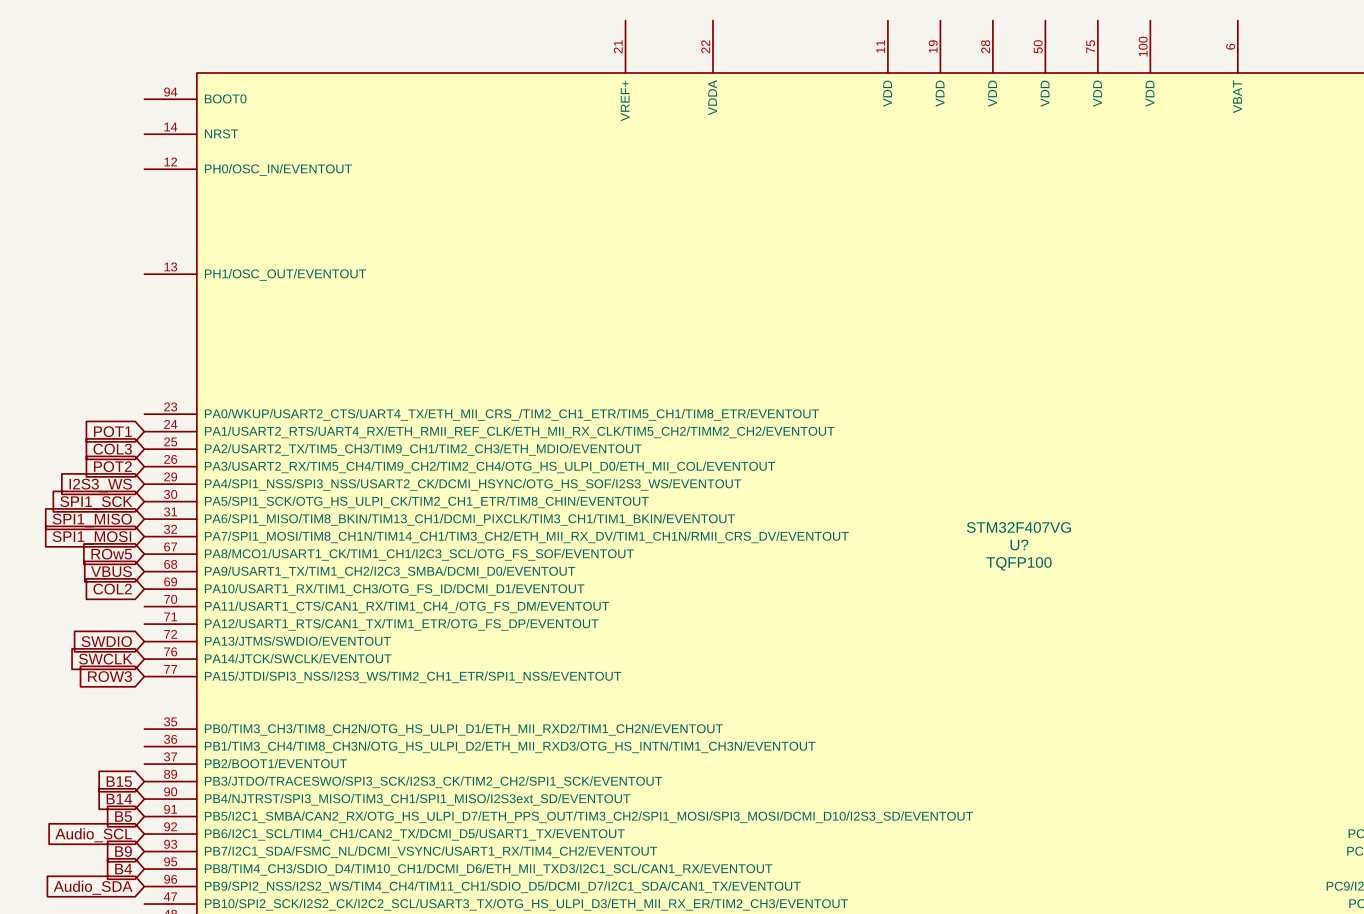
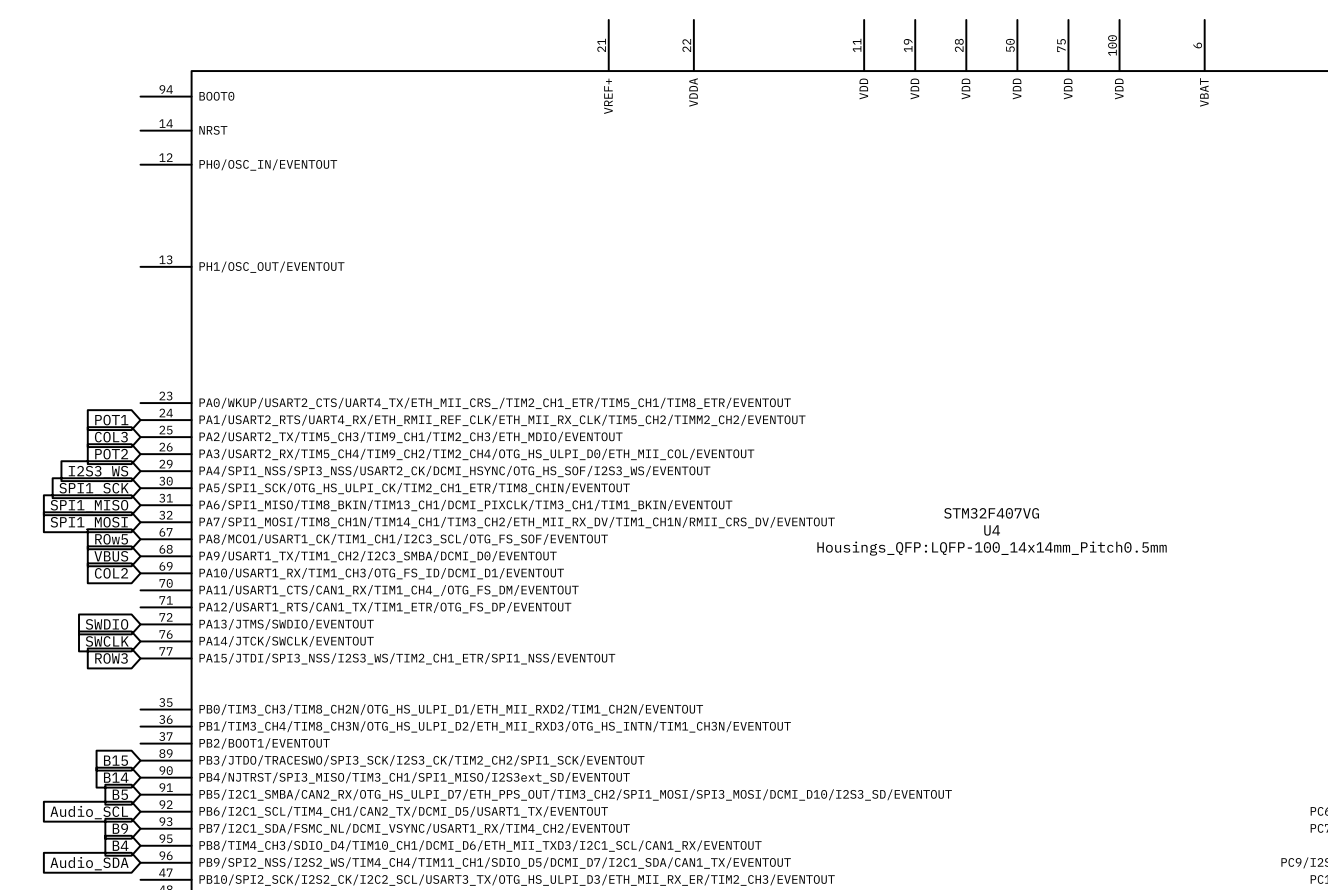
U? name: U? (1019, 544) -> U4 (992, 530)
U? text: TQFP100 (1019, 563) -> Housings_QFP:LQFP-100_14x14mm_Pitch0.5mm (992, 548)

